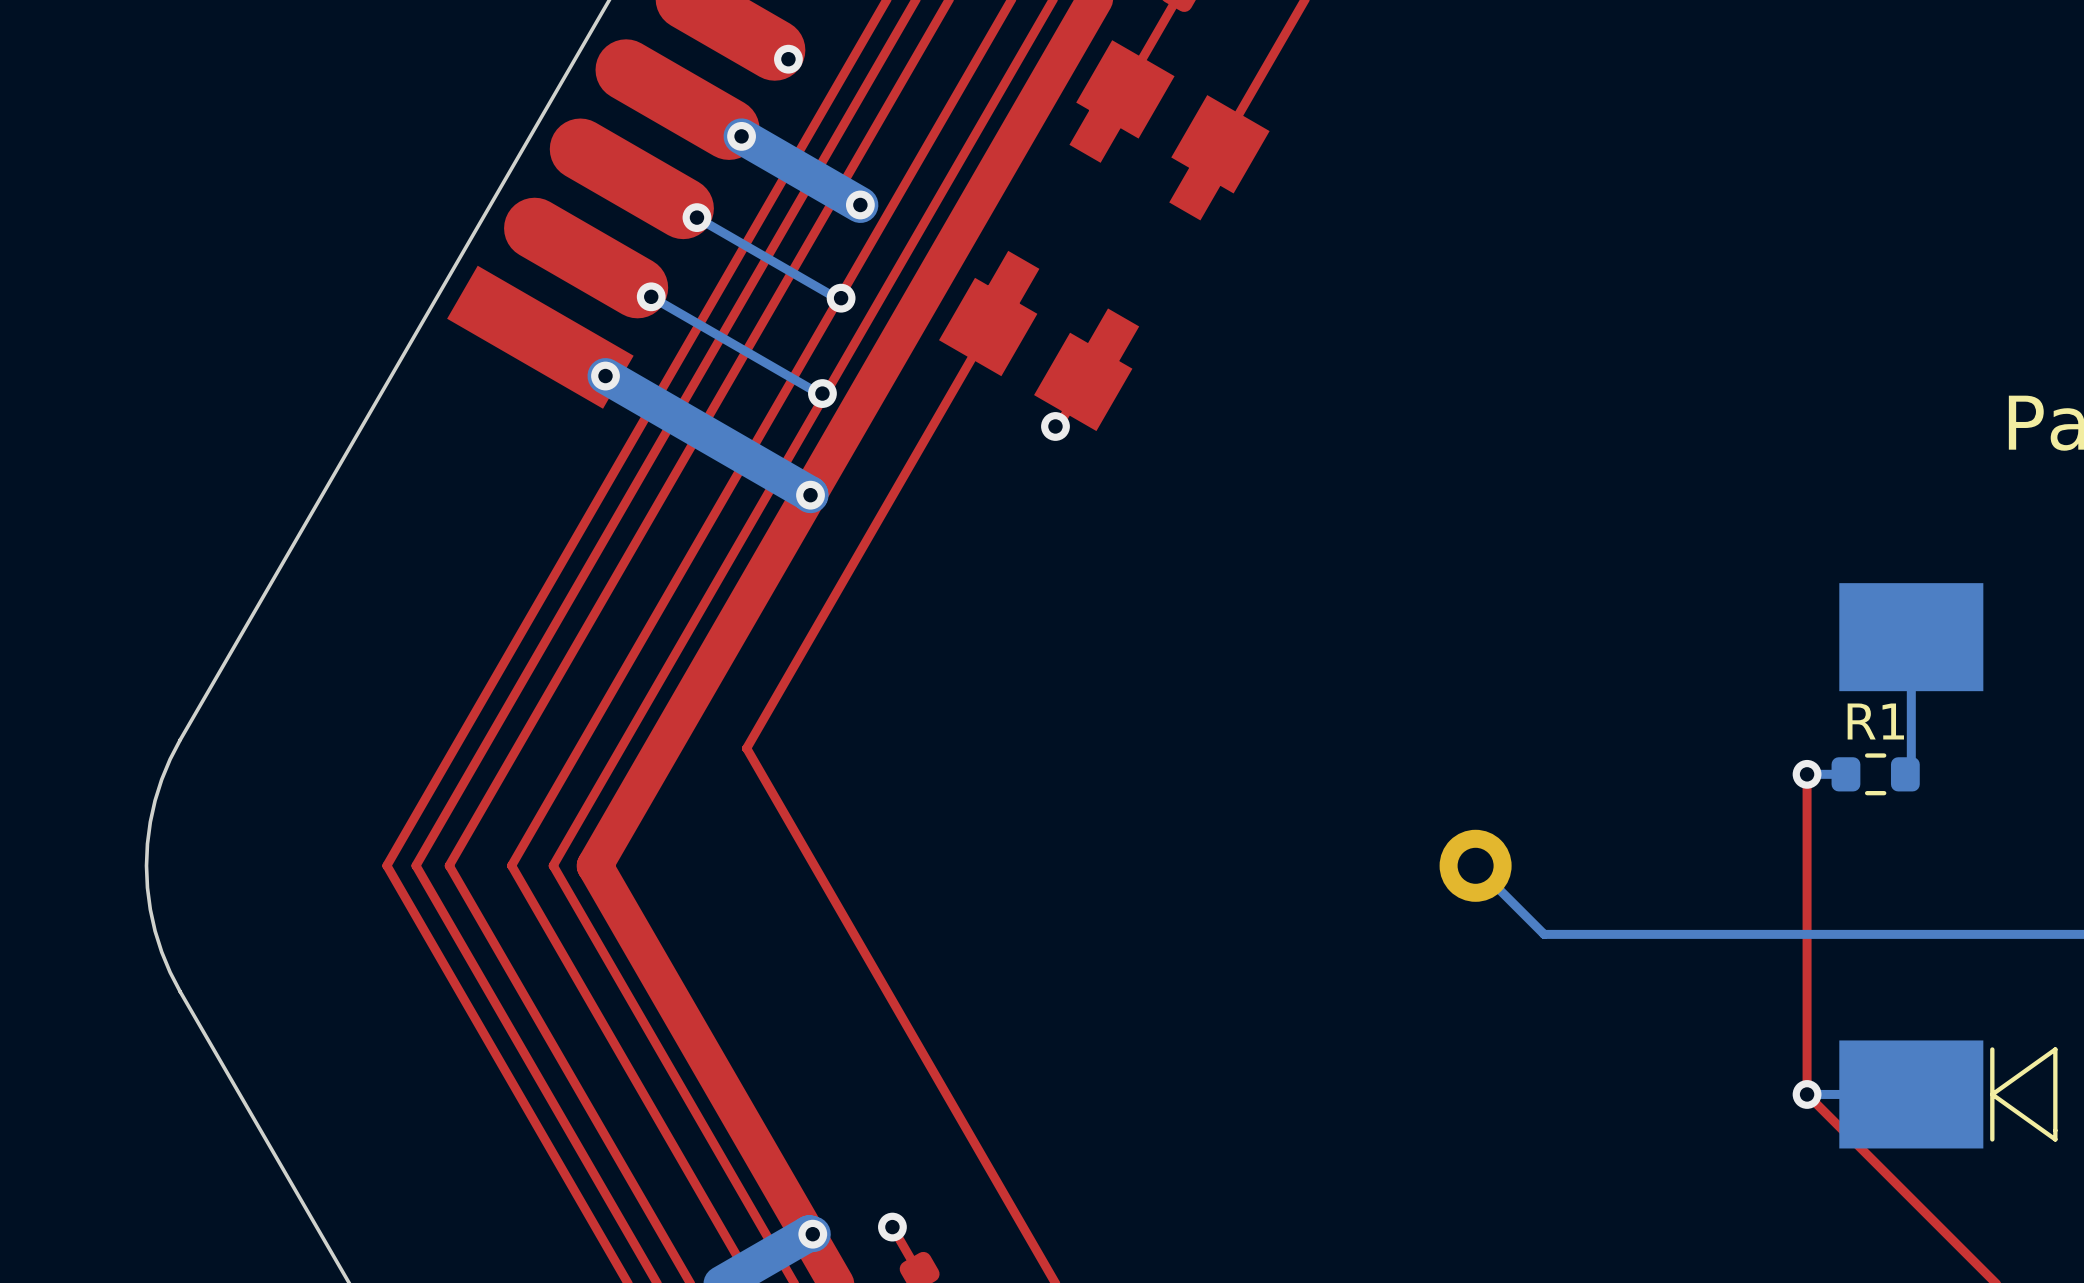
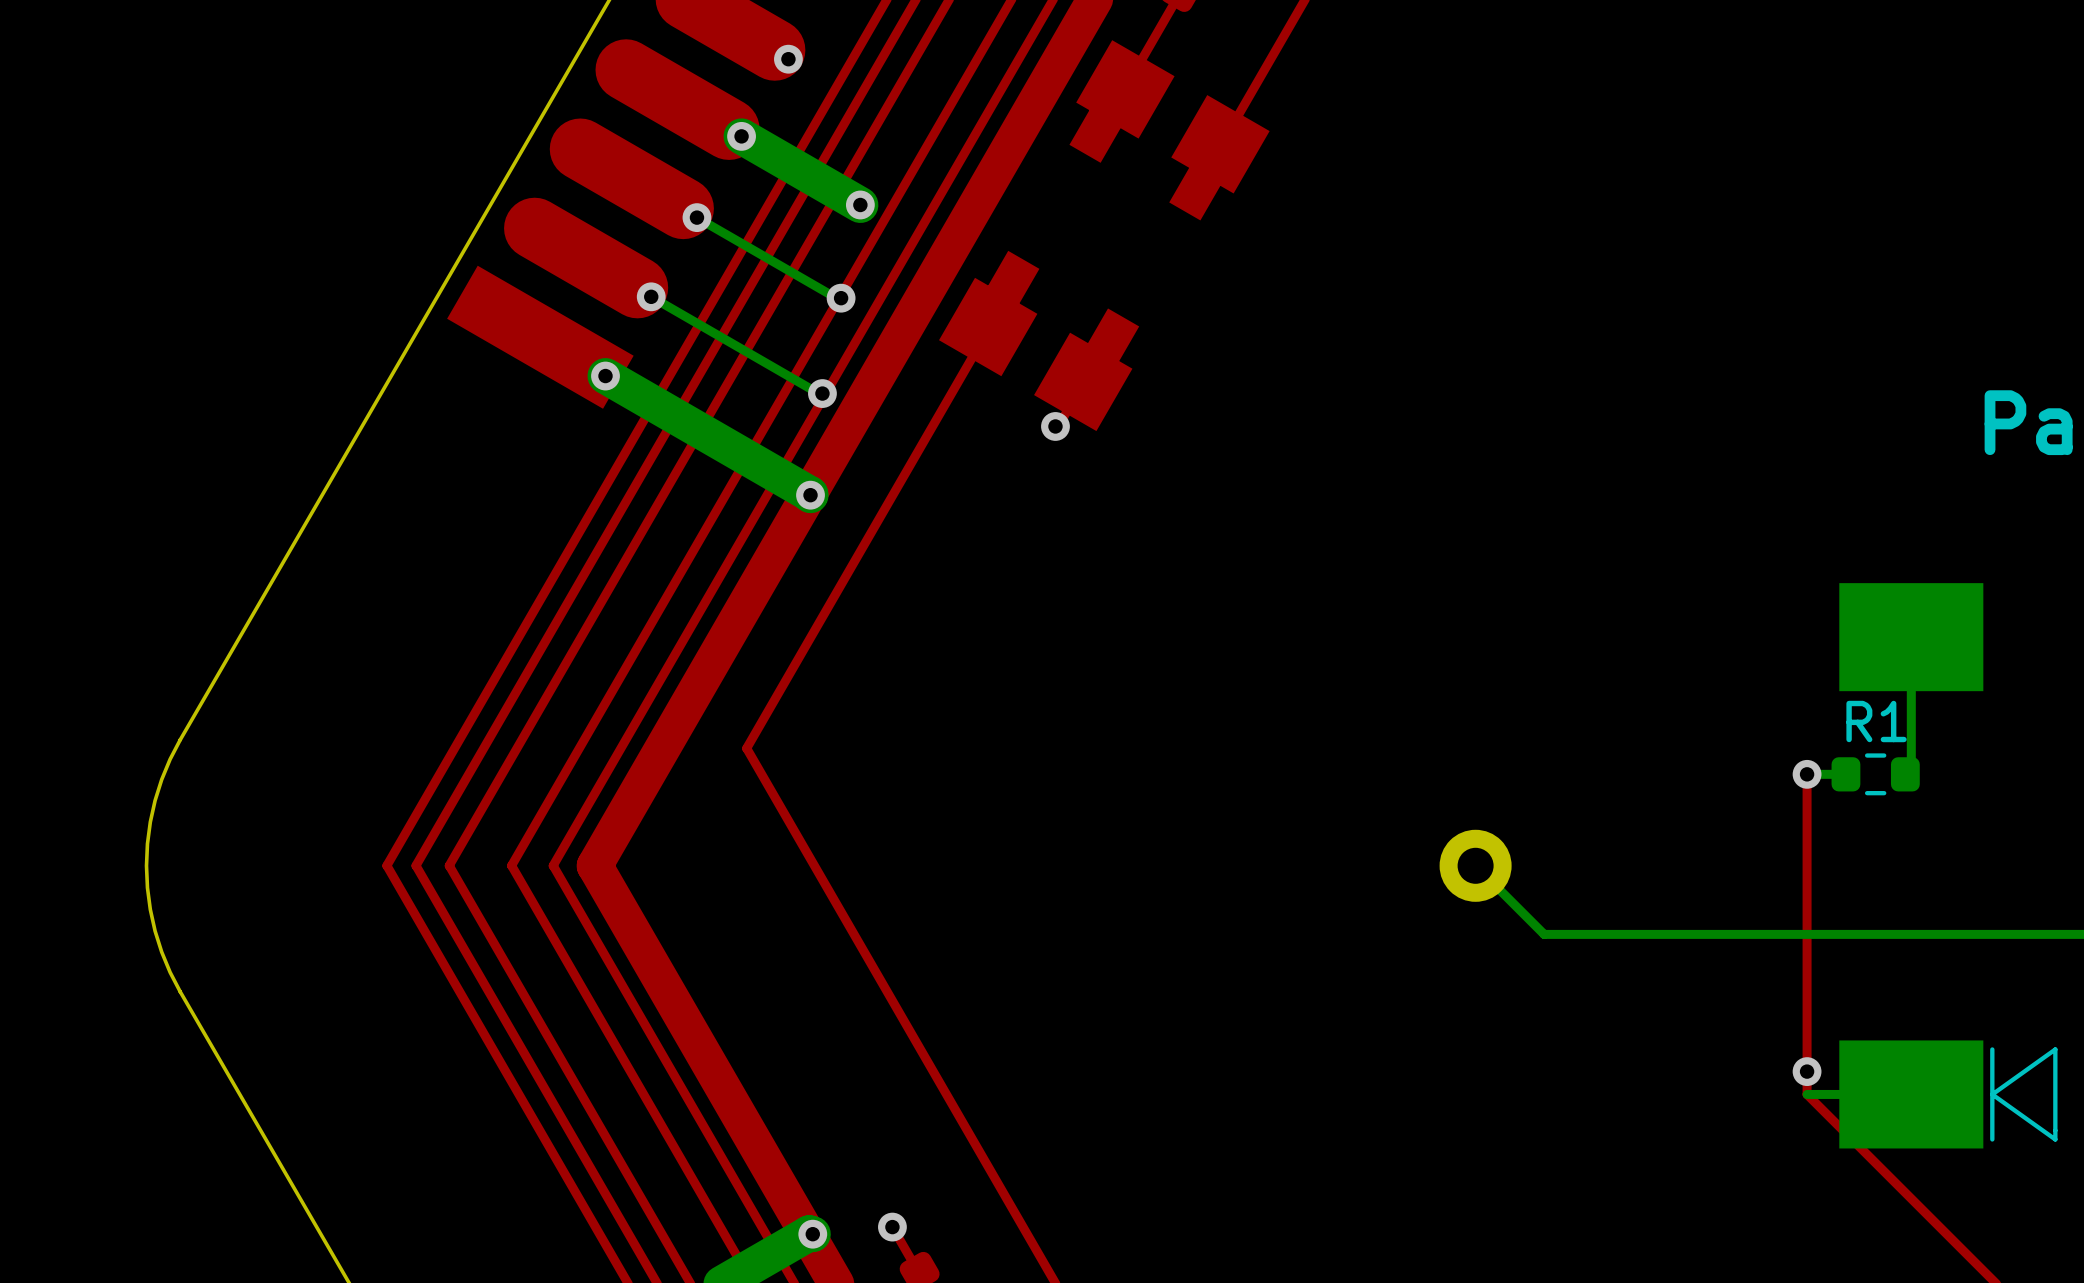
via position: (1807, 1094) -> (1807, 1071)

